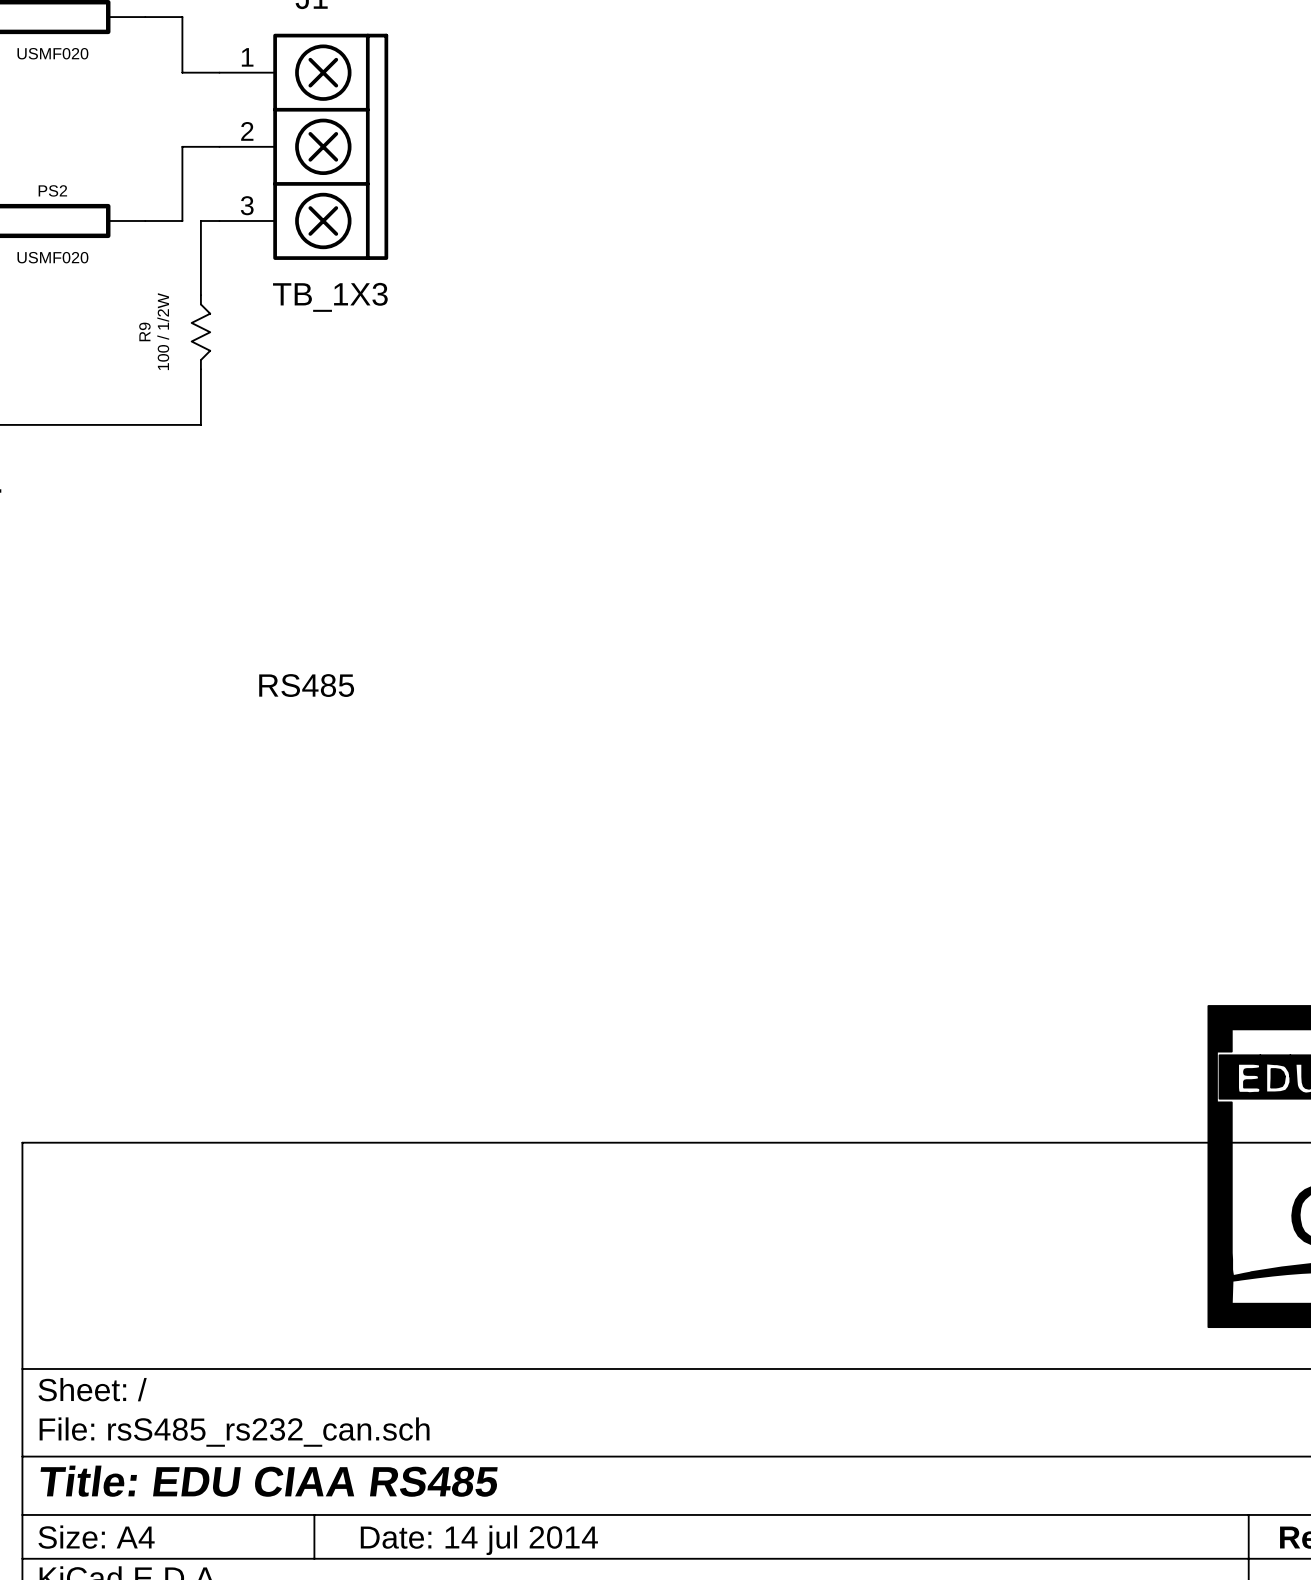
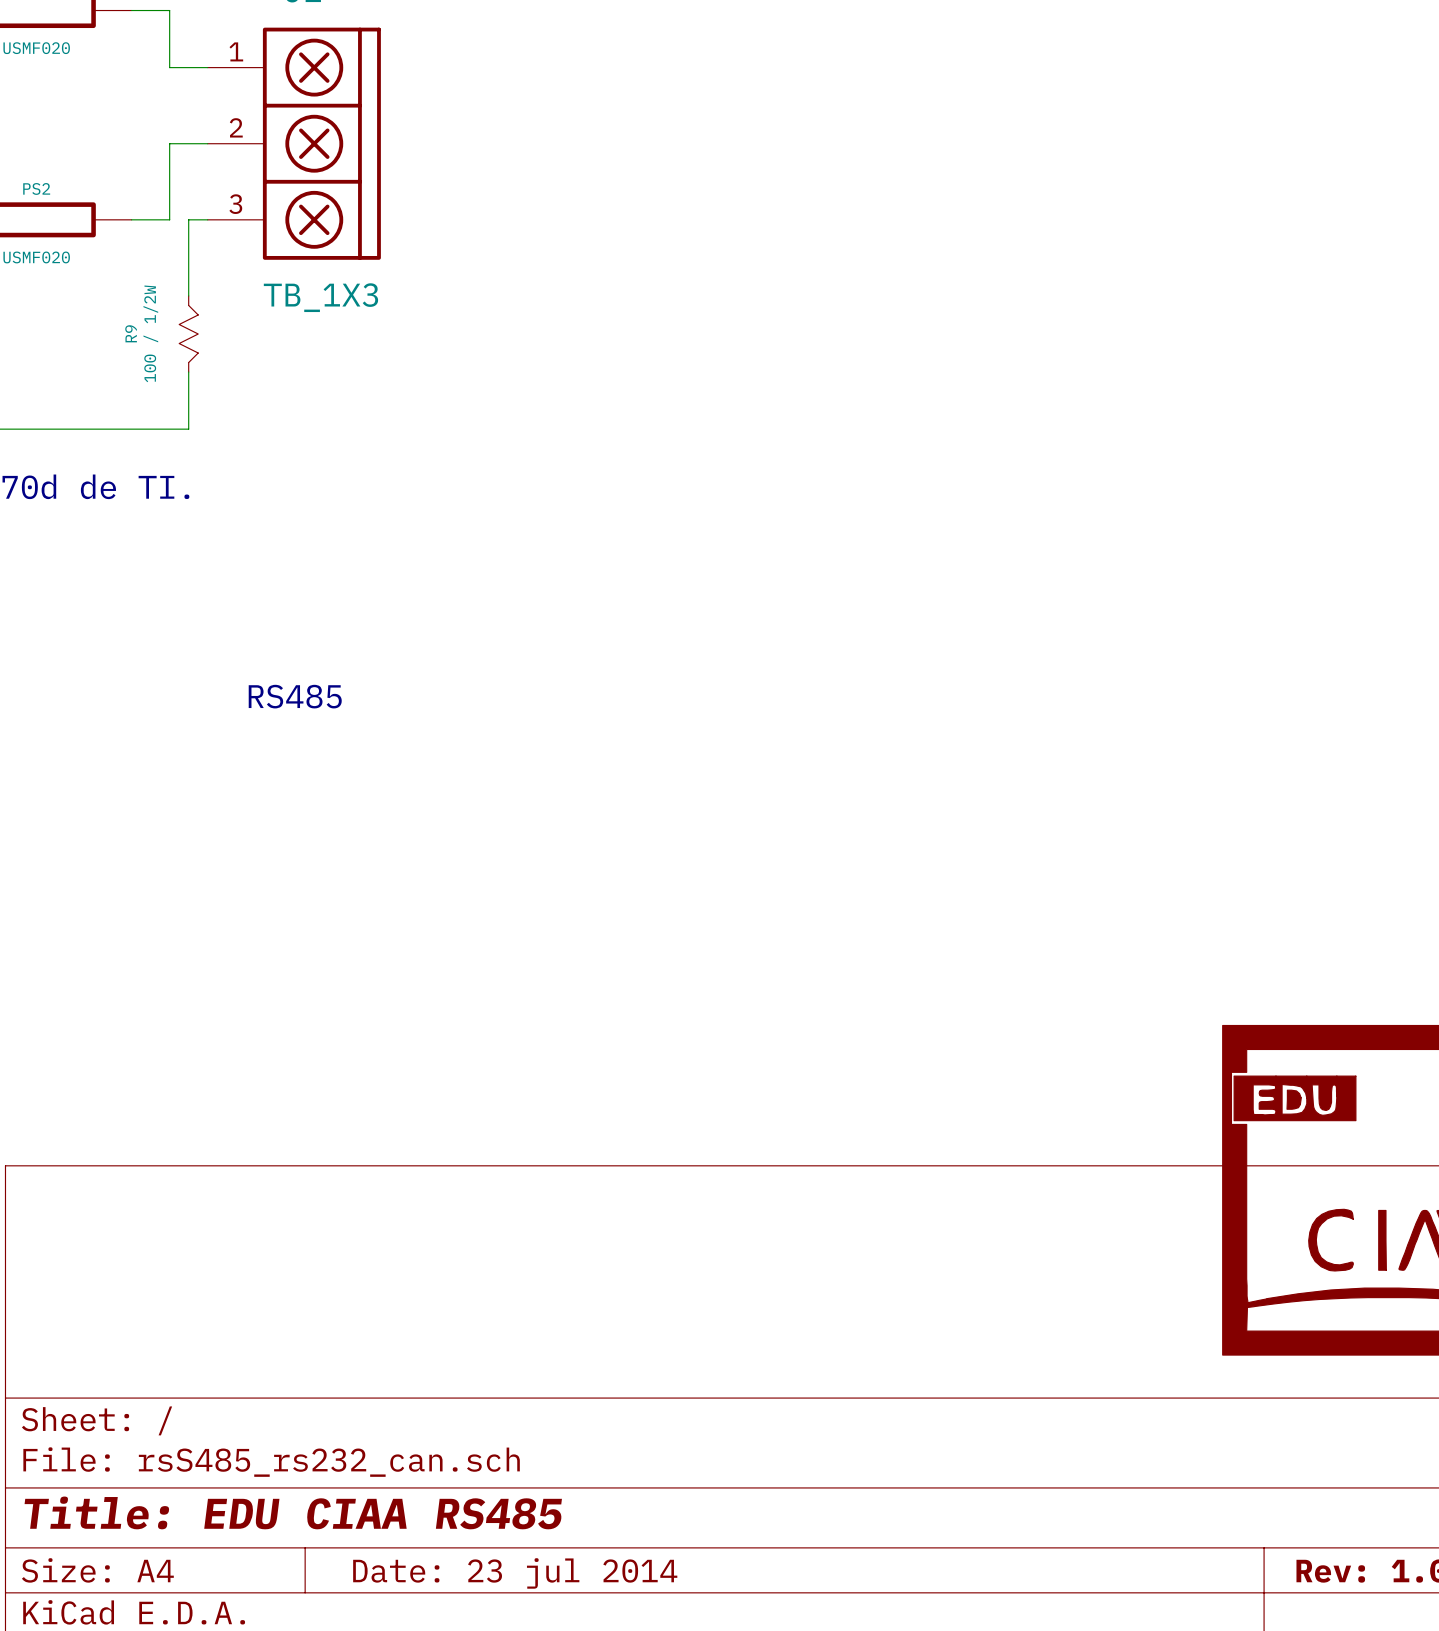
title block: Date: 14 jul 2014 (479, 1540) -> Date: 23 jul 2014 (515, 1573)

